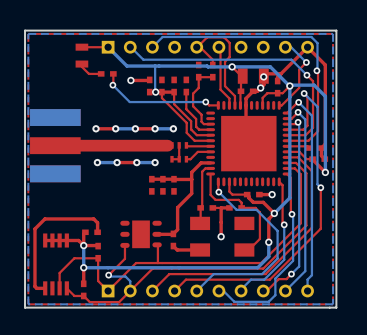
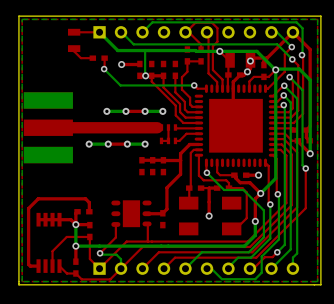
via: (95, 128) -> none
top track: (115, 128) (95, 128) -> none
top track: (173, 246) (177, 249) (200, 249) -> none

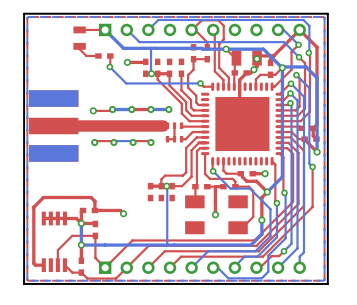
via: none -> (93, 110)
top track: none -> (112, 110) (93, 110)
top track: none -> (205, 137) (196, 137) (186, 148) (186, 172) (182, 175) (165, 175) (161, 179) (161, 186)
top track: none -> (150, 141) (133, 141)
bottom track: (108, 144) (89, 144) -> (133, 141) (113, 141)
top track: (127, 144) (108, 144) -> (113, 141) (94, 141)
bottom track: (145, 144) (127, 144) -> none
top track: (192, 144) (189, 144) (180, 153) (180, 174) (166, 187) (166, 209) (162, 213) (147, 213) -> (198, 142) (191, 150) (191, 176) (182, 186) (161, 186)
top track: (141, 160) (180, 160) -> none
part: (141, 166) -> none
part: (152, 166) -> none
part: (163, 166) -> none
top track: none -> (161, 186) (150, 186)
bottom track: none -> (166, 186) (167, 245)
via: none -> (166, 186)
part: none -> (150, 192)
part: none -> (161, 192)
part: none -> (172, 192)
top track: none -> (94, 210) (120, 210) (123, 213)
part: (131, 213) -> none
via: none -> (123, 213)
part: (162, 219) -> none
top track: (147, 223) (147, 241) -> none
top track: (115, 224) (115, 237) (100, 253) -> none
bottom track: (100, 253) (116, 254) (121, 259) (121, 268) -> none
via: (100, 253) -> none

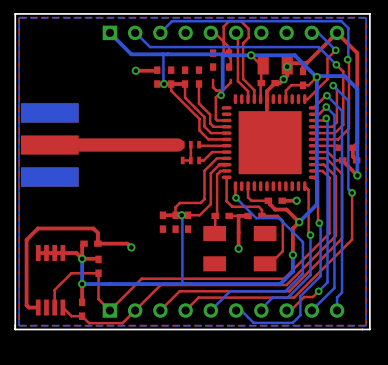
top track: (105, 29) (79, 29) -> none
top track: (192, 29) (201, 20) (218, 20) (223, 25) (223, 39) (219, 44) (219, 67) (228, 79) -> (230, 65) (230, 58) (223, 51) (223, 26) (229, 21) (241, 21) (248, 28) (248, 37) (243, 43) (243, 78) (254, 90)
part: (79, 38) -> none
top track: (79, 46) (79, 49) (86, 55) (98, 55) -> none
bottom track: none -> (222, 54) (222, 90)
part: (104, 55) -> none
top track: (110, 55) (109, 66) -> none
top track: (207, 59) (193, 59) (193, 69) (188, 75) (188, 87) (196, 95) (196, 102) (198, 104) -> (230, 79) (230, 82) (215, 97) (215, 119) (219, 120)
bottom track: (109, 66) (126, 83) (200, 83) -> none
via: (109, 66) -> none
top track: none -> (213, 79) (213, 87) (216, 90) (222, 90)
top track: (200, 83) (203, 86) (212, 86) -> none
via: (112, 109) -> none
bottom track: (131, 109) (112, 109) -> none
via: (131, 109) -> none
top track: (150, 109) (131, 109) -> none
via: (150, 109) -> none
bottom track: (168, 109) (150, 109) -> none
via: (168, 109) -> none
via: (93, 110) -> none
top track: (112, 110) (93, 110) -> none
top track: (113, 141) (94, 141) -> none
bottom track: (133, 141) (113, 141) -> none
top track: (150, 141) (133, 141) -> none
via: (94, 142) -> none
via: (113, 142) -> none
via: (133, 142) -> none
via: (150, 142) -> none

